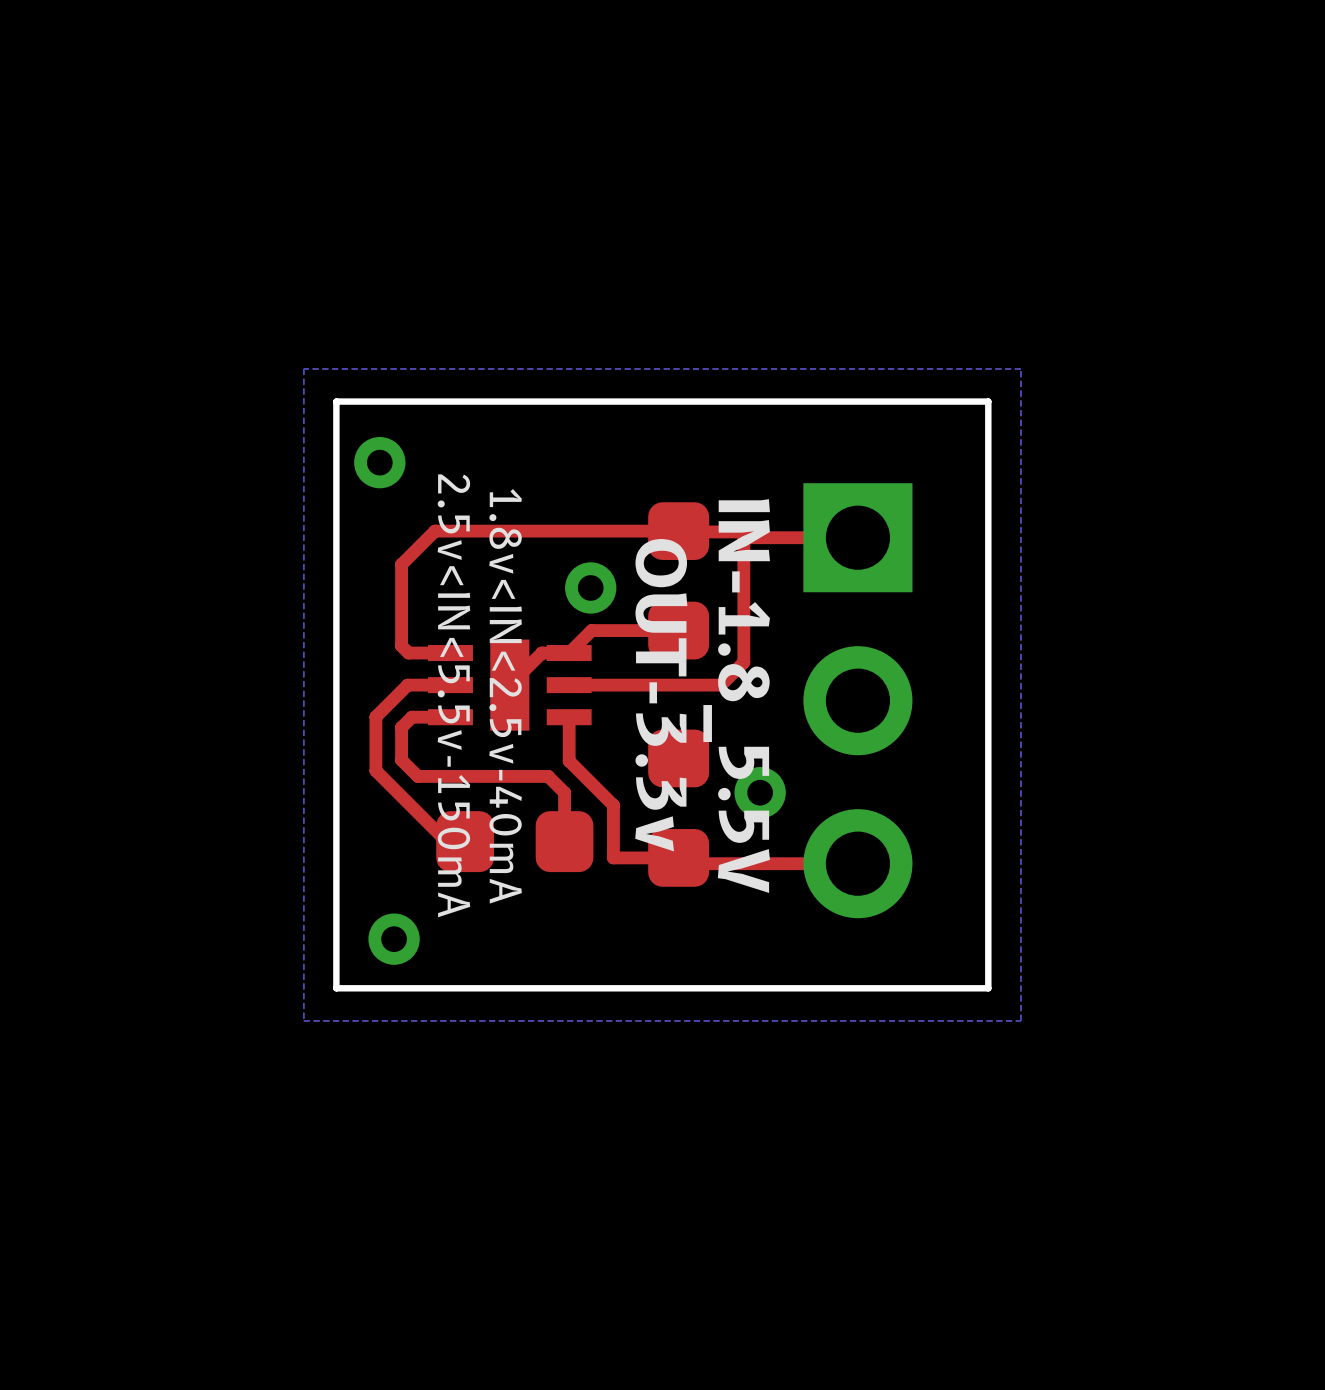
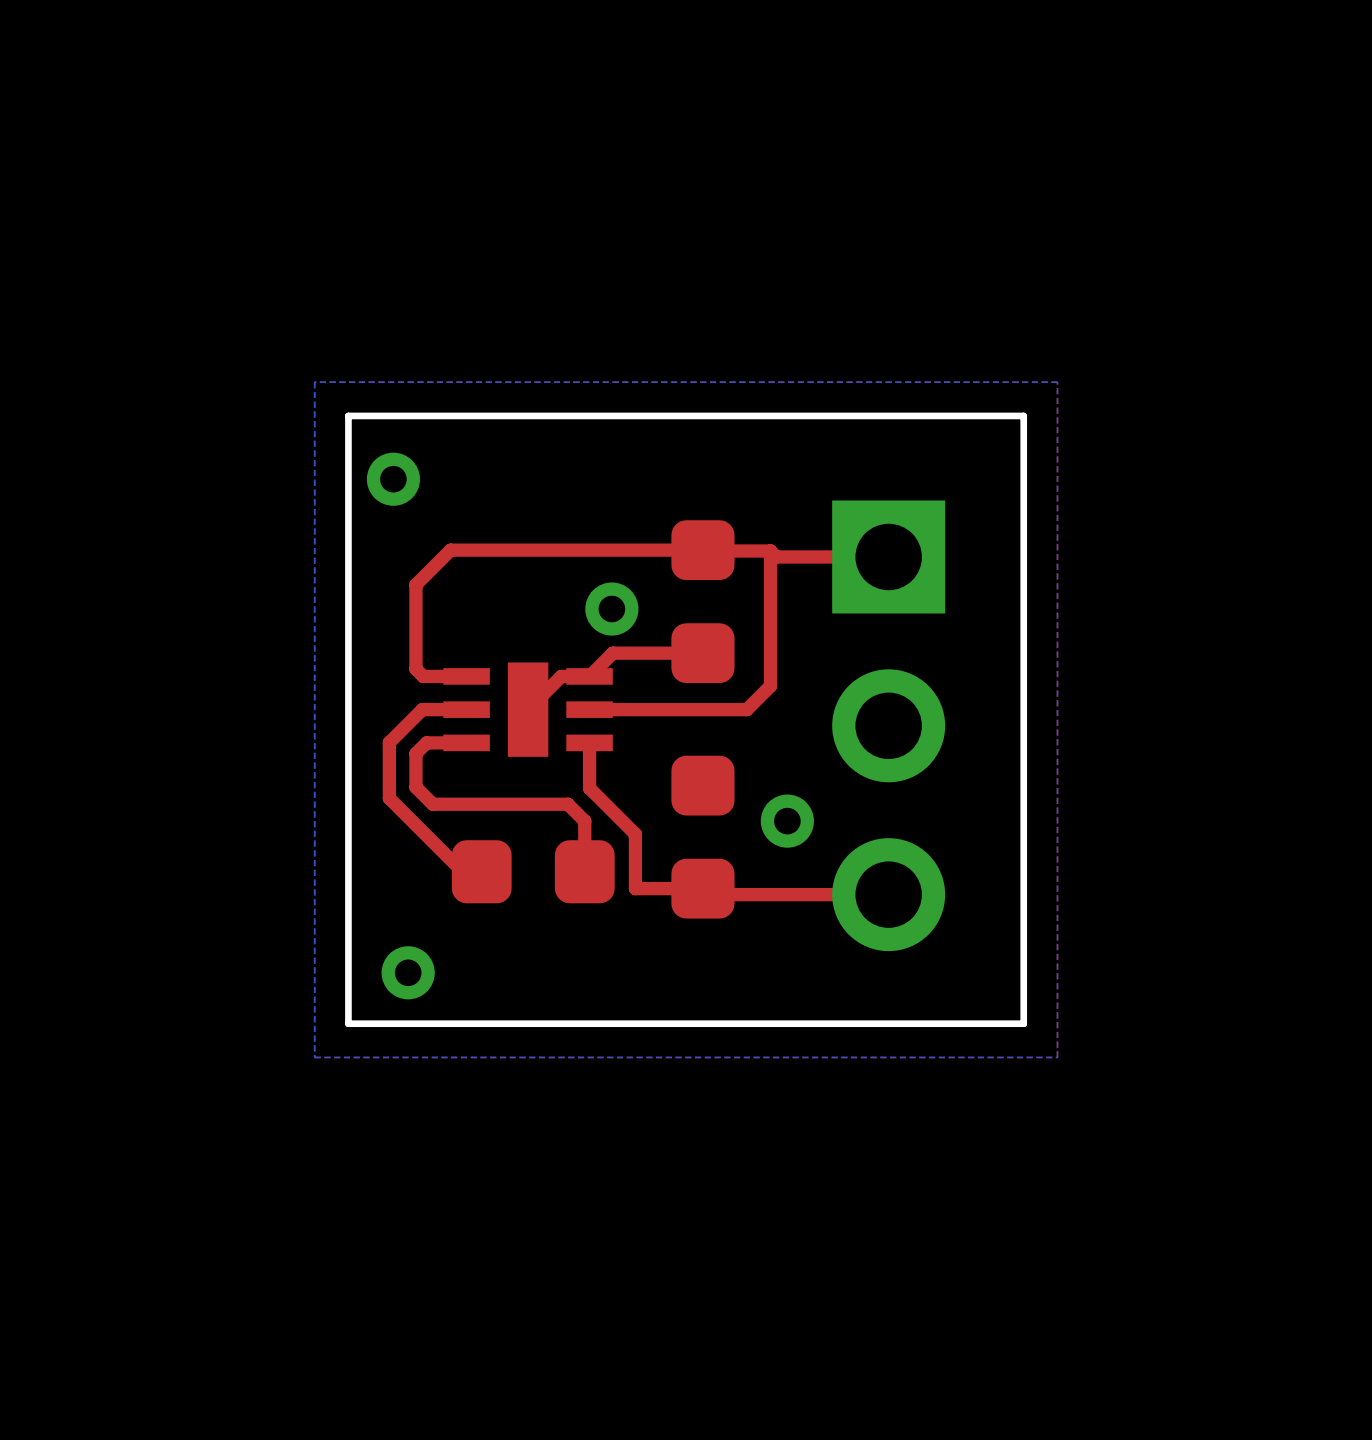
text: 2.5v<IN<5.5v-150mA (453, 695) -> none
text: OUT-3.3v (661, 695) -> none
text: 1.8v<IN<2.5v-40mA (505, 696) -> none
text: IN-1.8_5.5V (736, 696) -> none

